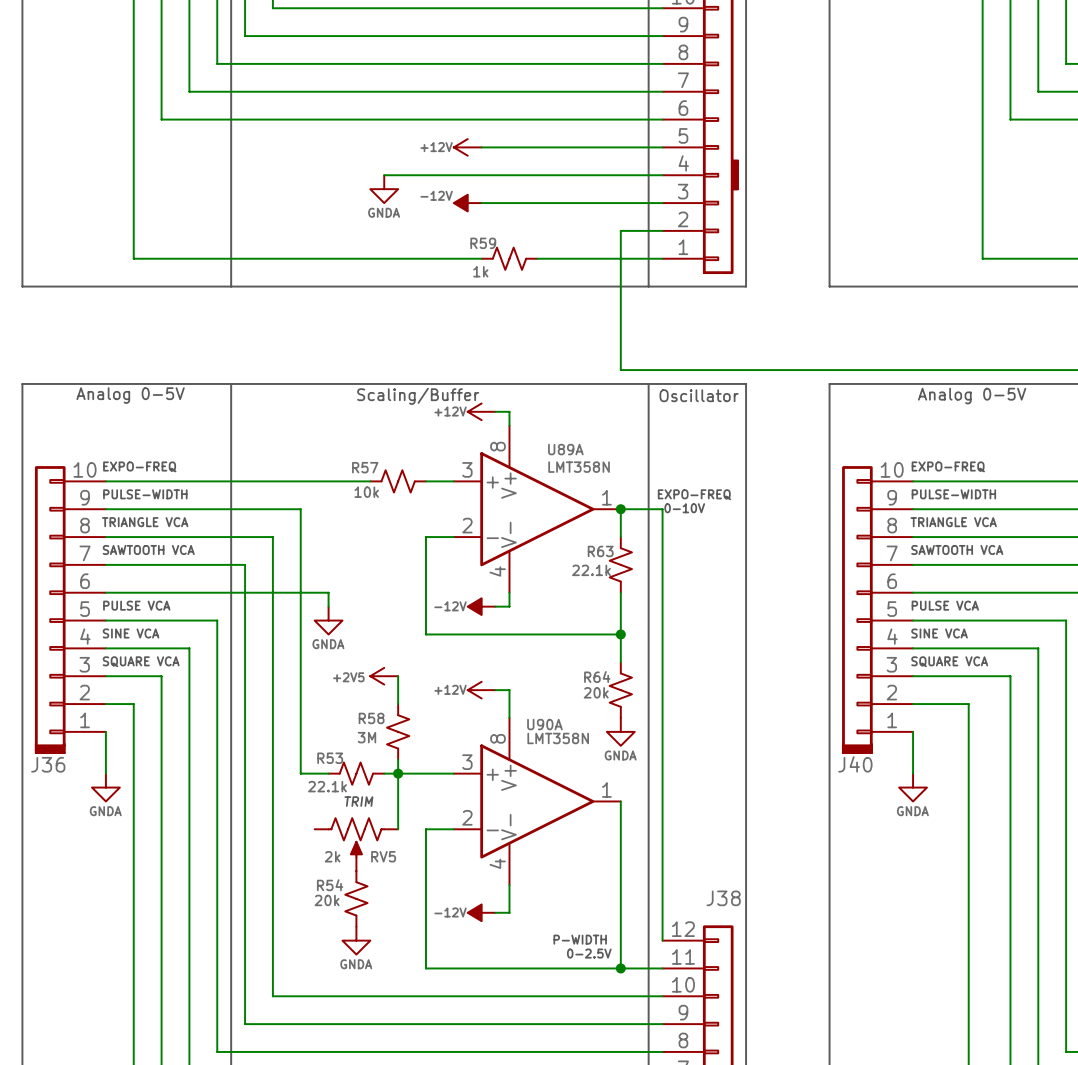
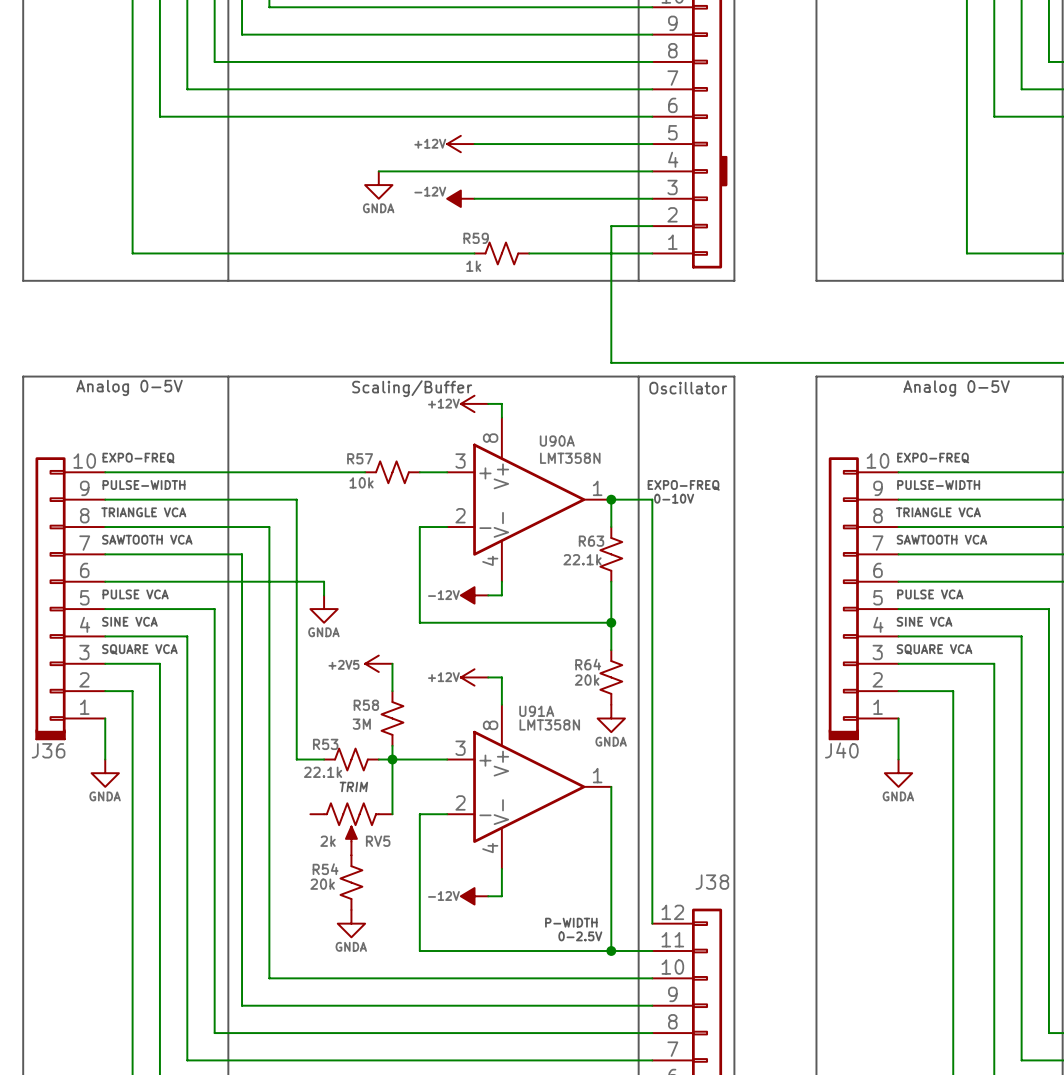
U89A name: U89A (565, 449) -> U90A (557, 441)
U90A name: U90A (544, 724) -> U91A (536, 711)

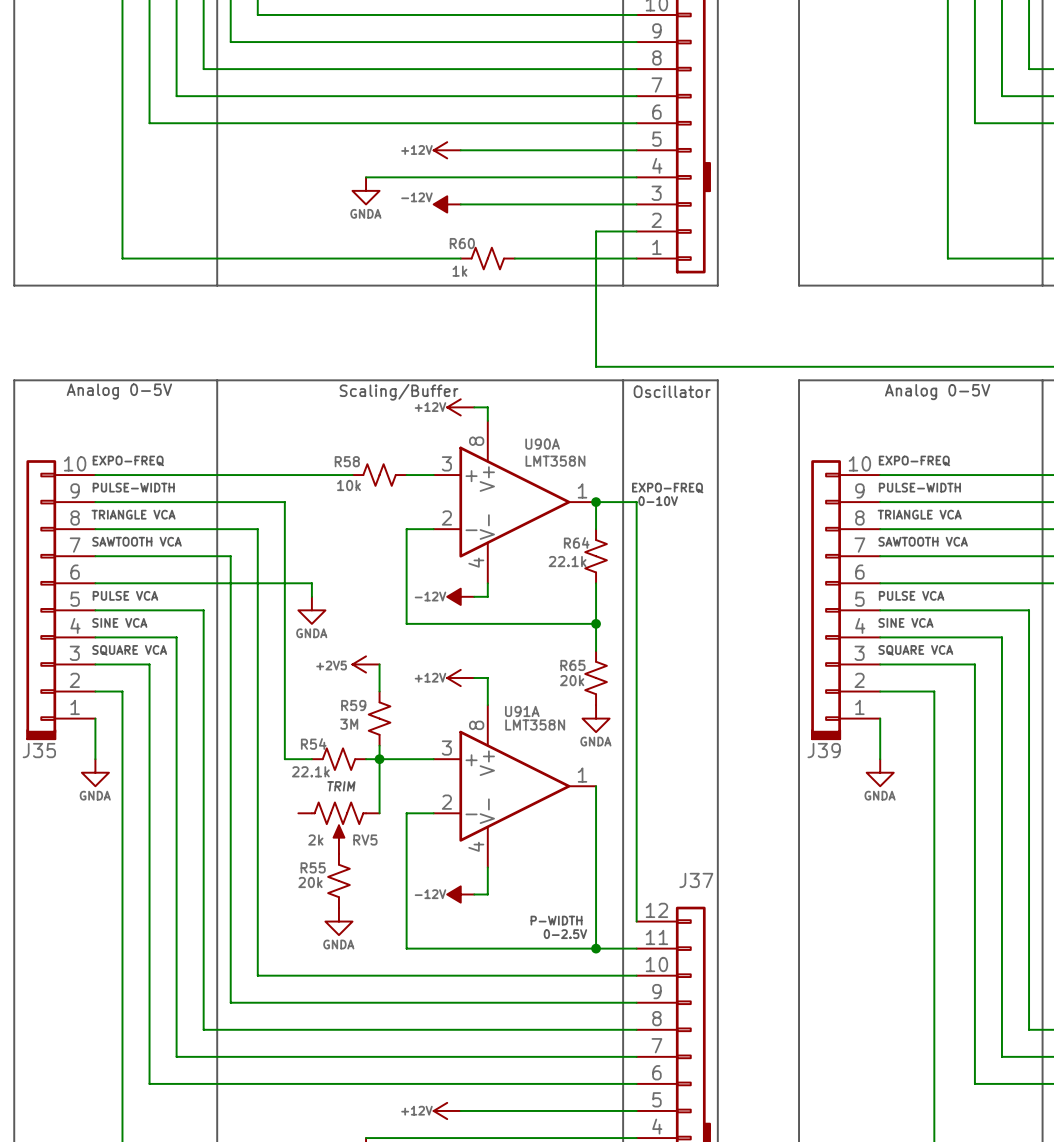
R59 name: R59 (476, 238) -> R60 (462, 243)
R57 name: R57 (360, 458) -> R58 (347, 461)
R63 name: R63 (591, 541) -> R64 (576, 542)
R64 name: R64 (588, 664) -> R65 (572, 665)
R58 name: R58 (366, 705) -> R59 (353, 705)
R53 name: R53 (325, 744) -> R54 (313, 743)
J36 name: J36 (48, 750) -> J35 (39, 750)
J40 name: J40 (841, 750) -> J39 (824, 750)
R54 name: R54 (325, 869) -> R55 (313, 867)
J38 name: J38 (712, 882) -> J37 (696, 880)

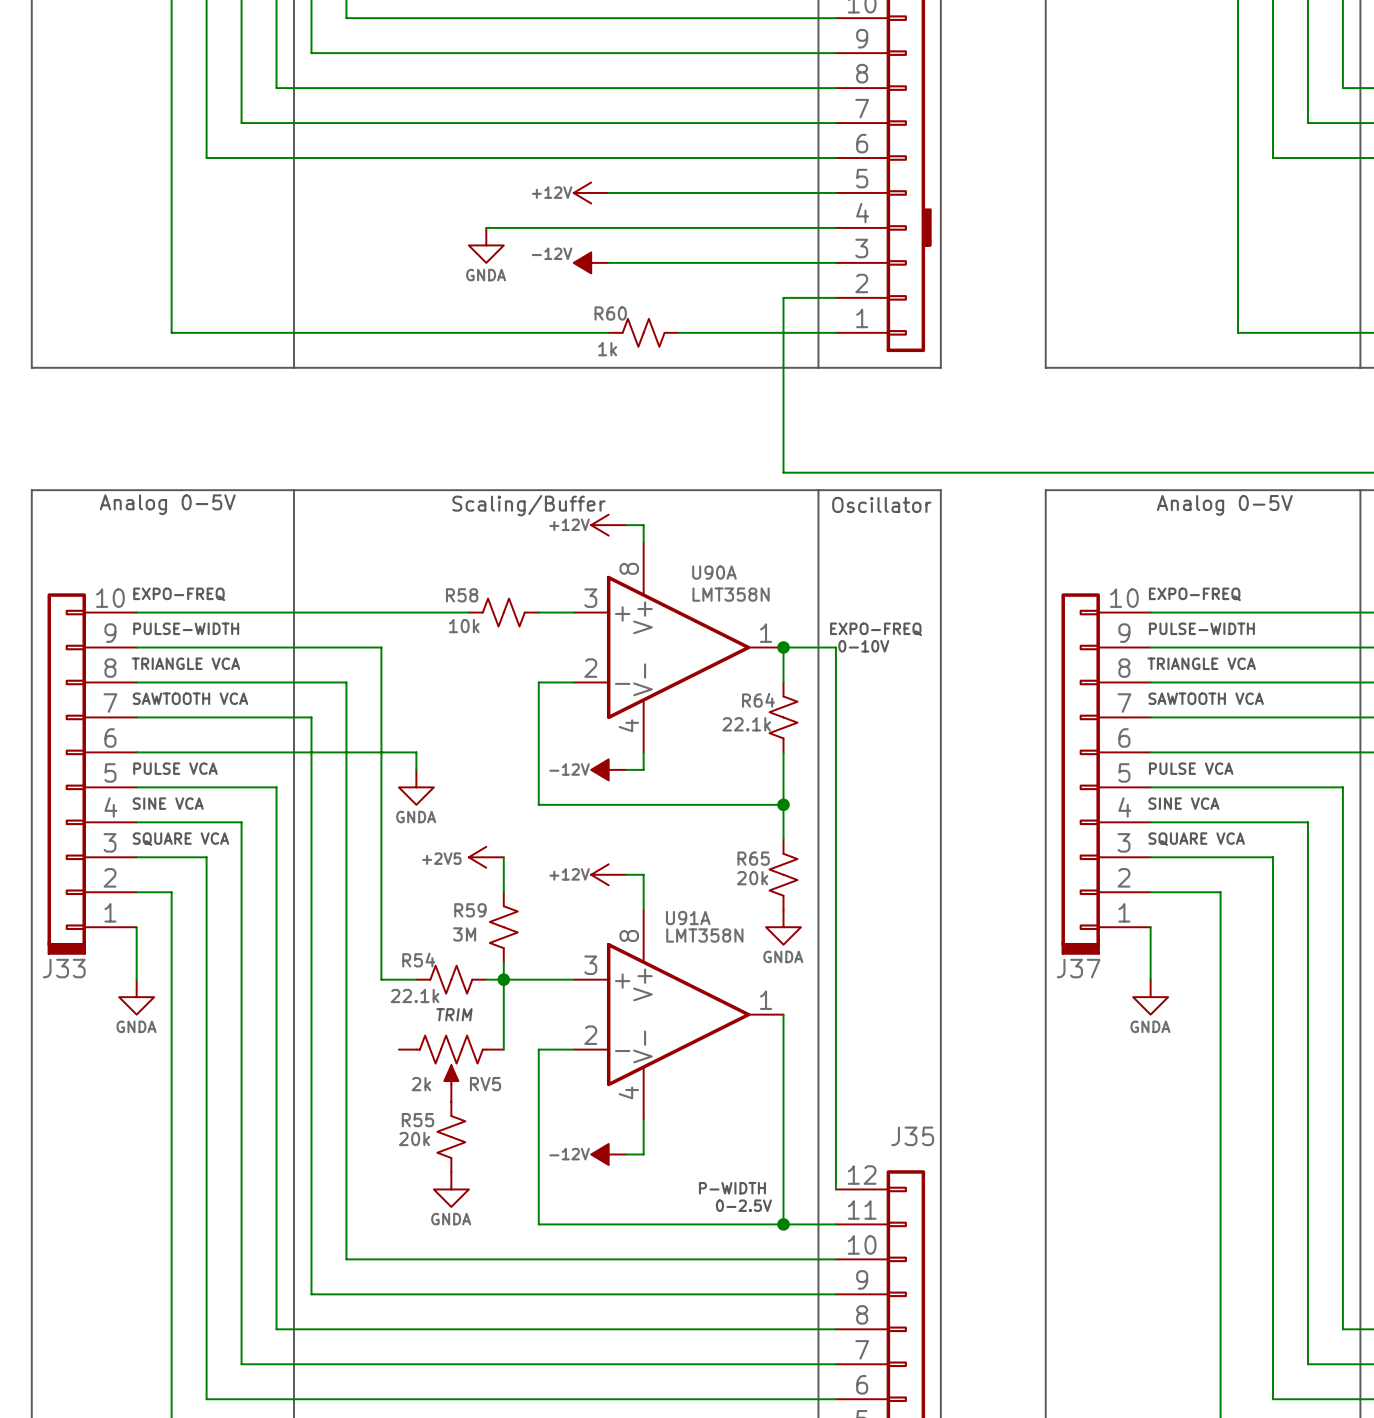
J35 name: J35 (39, 750) -> J33 (64, 968)
J39 name: J39 (824, 750) -> J37 (1078, 968)
J37 name: J37 (696, 880) -> J35 (912, 1136)

